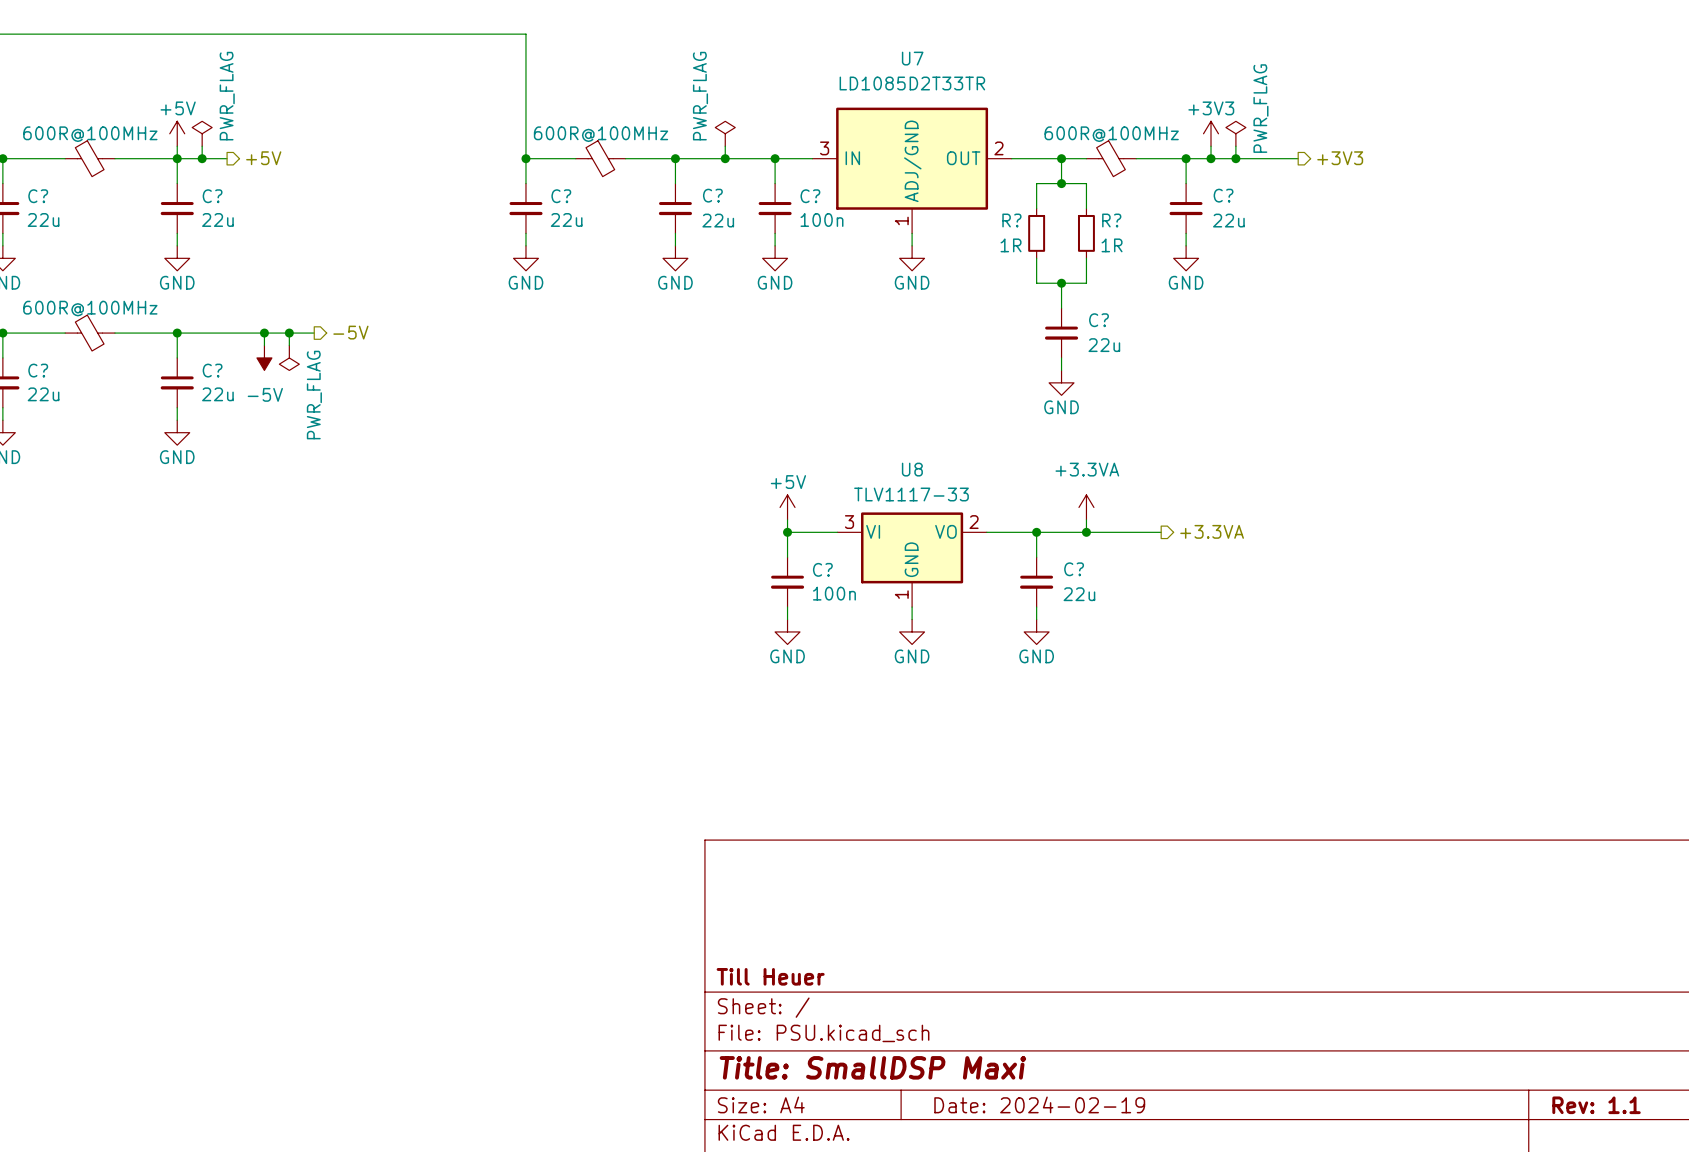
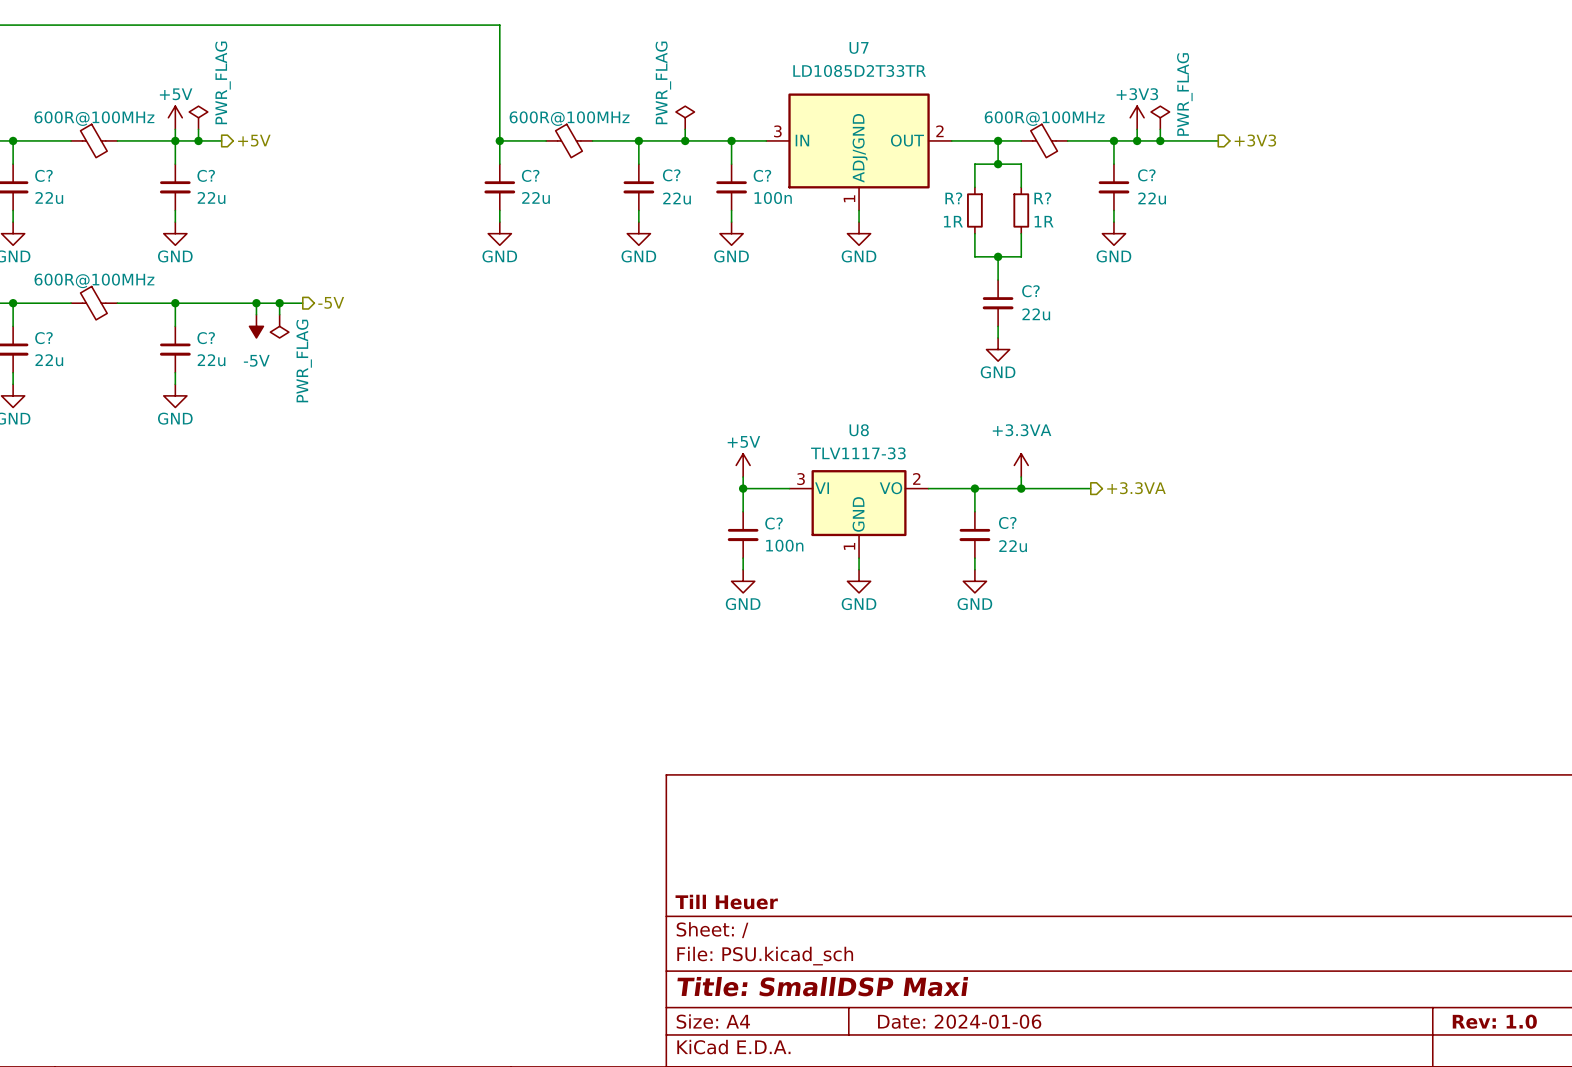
title block: Date: 2024-02-19 (1039, 1104) -> Date: 2024-01-06 (959, 1021)
title block: Rev: 1.1 (1596, 1105) -> Rev: 1.0 (1494, 1021)

